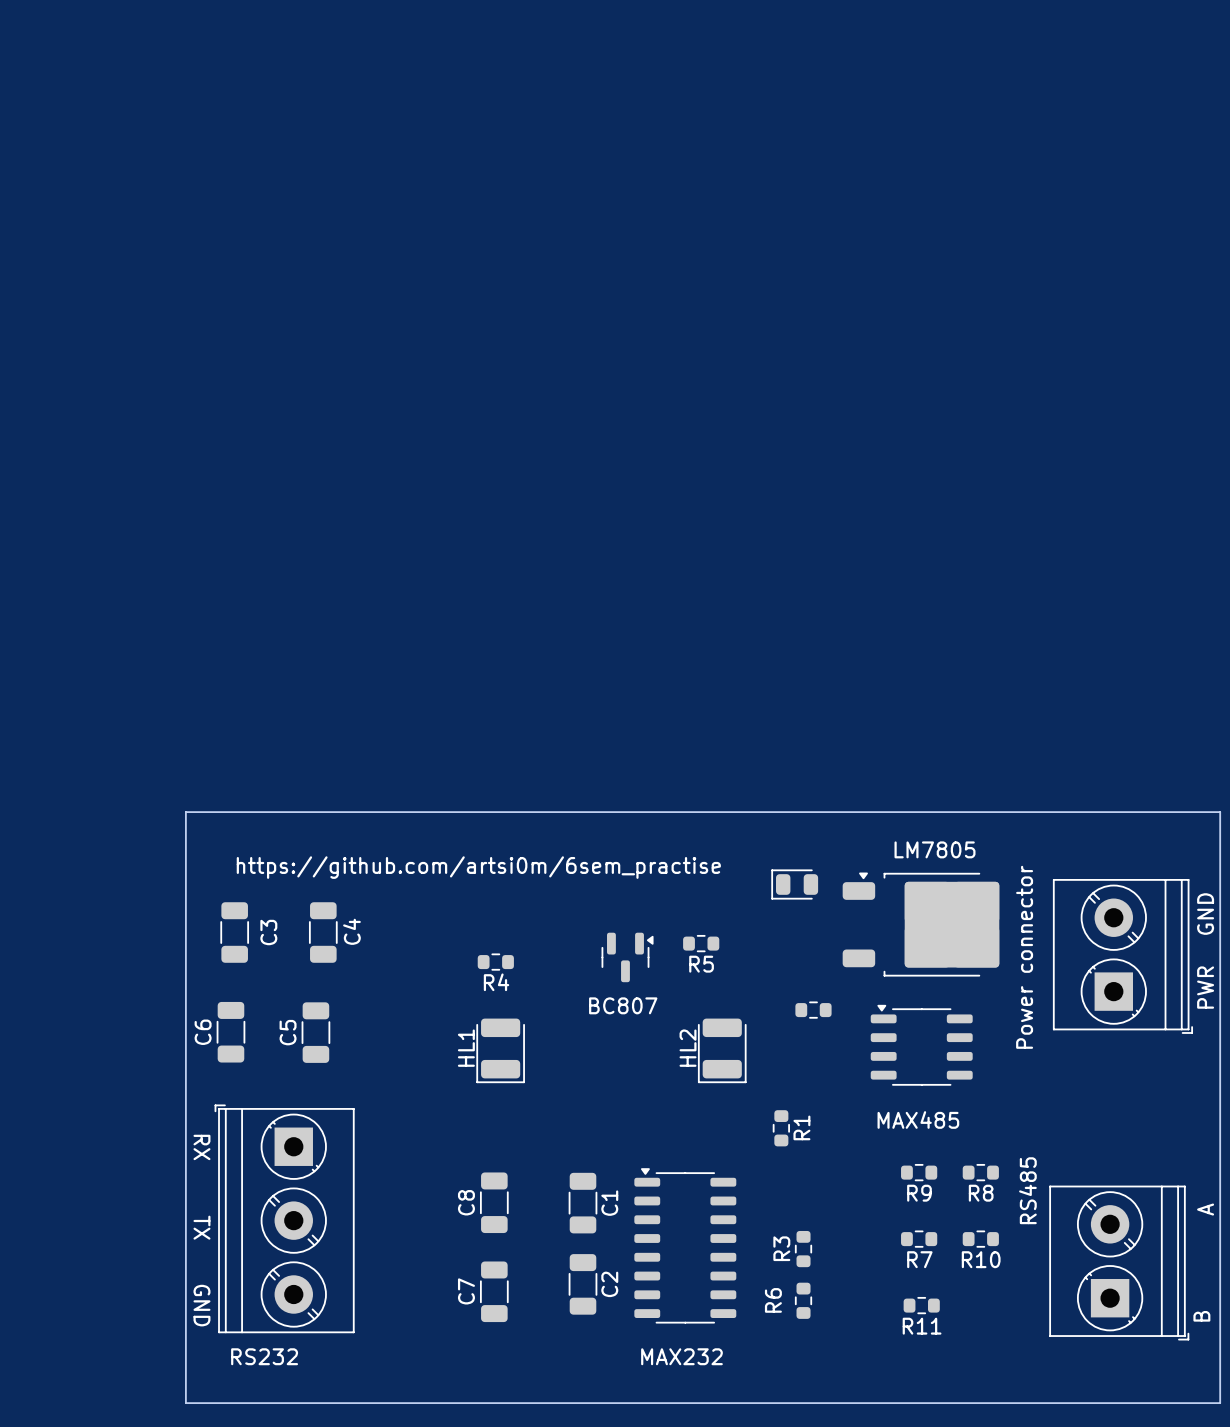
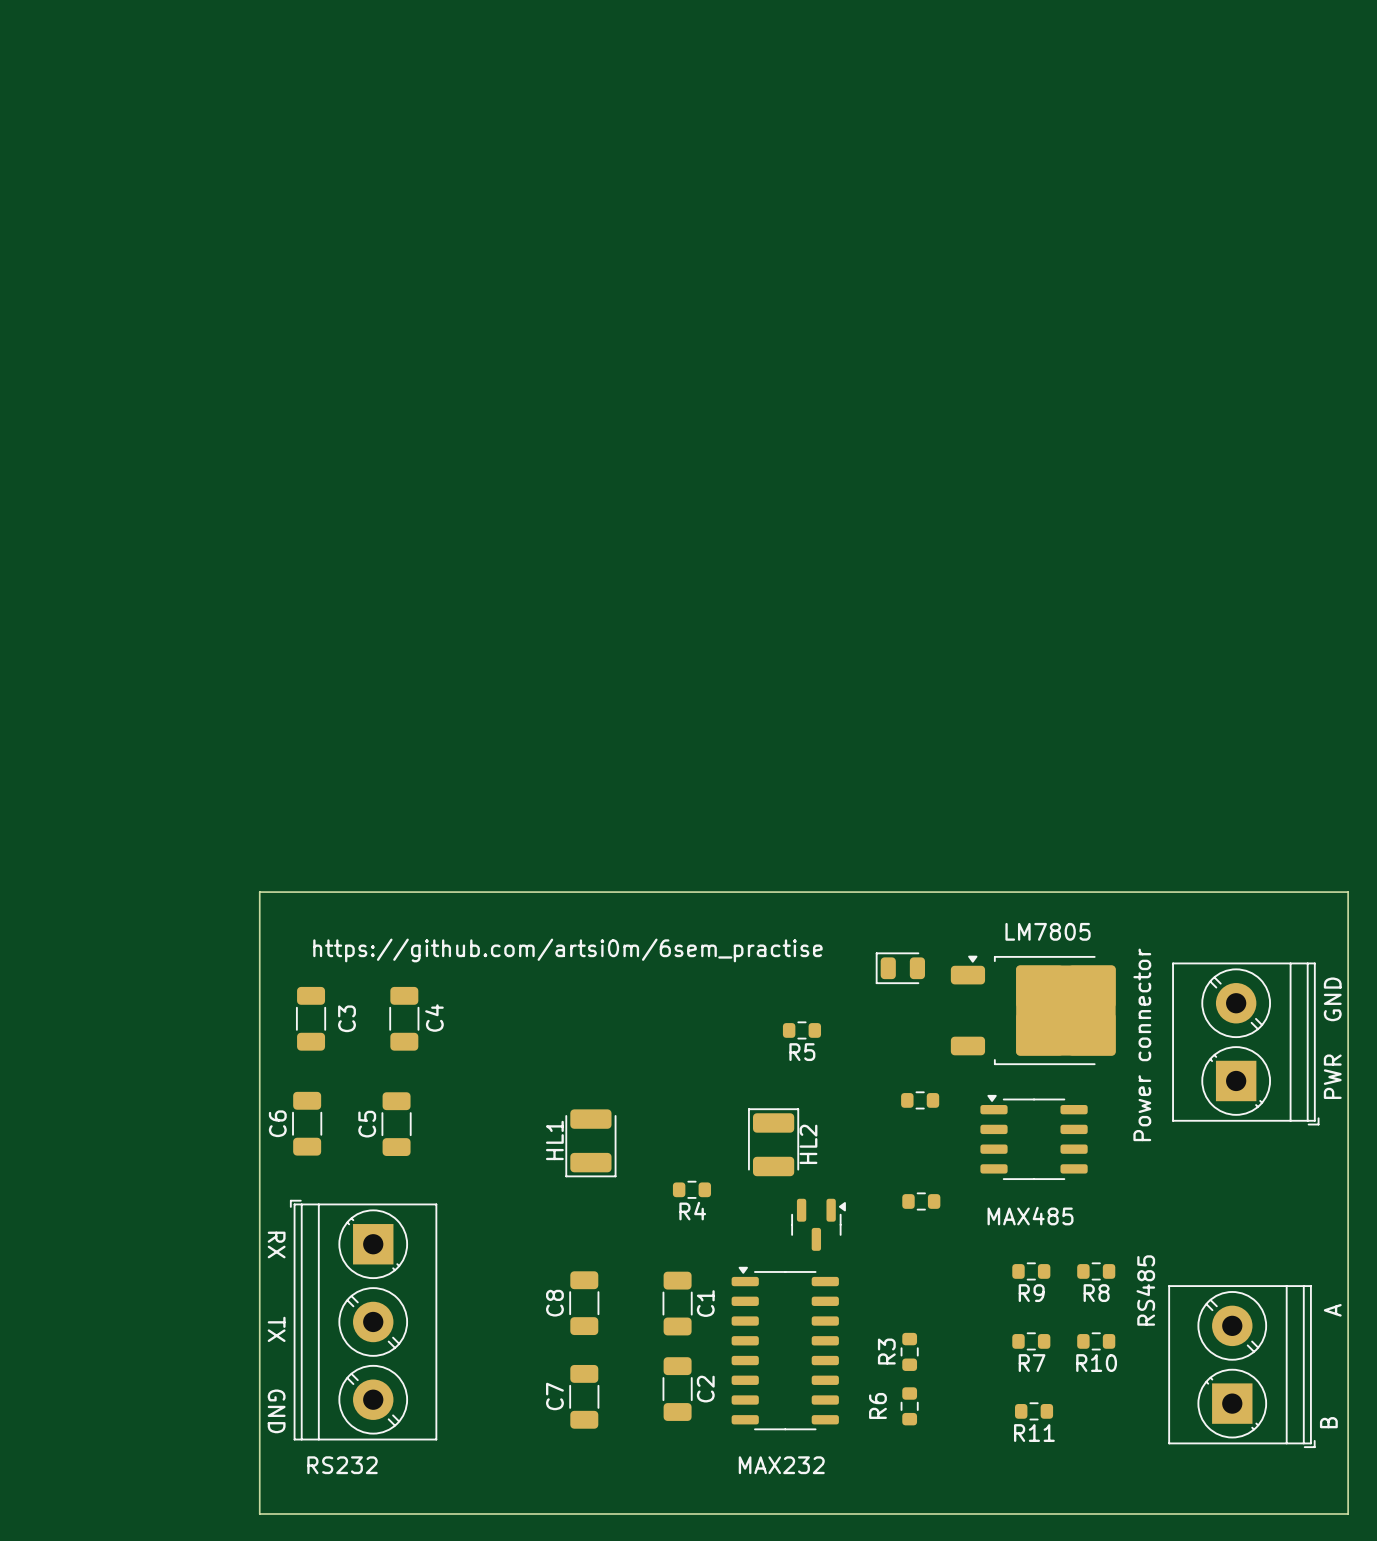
BC807: (627, 957) -> none
R4 position: (495, 962) -> (691, 1189)
HL2 rotation: 0° (722, 1050) -> 180° (773, 1142)
HL2 position: (722, 1050) -> (773, 1142)
part: none -> (921, 1201)
part: none -> (818, 1224)
R1: (781, 1128) -> none

